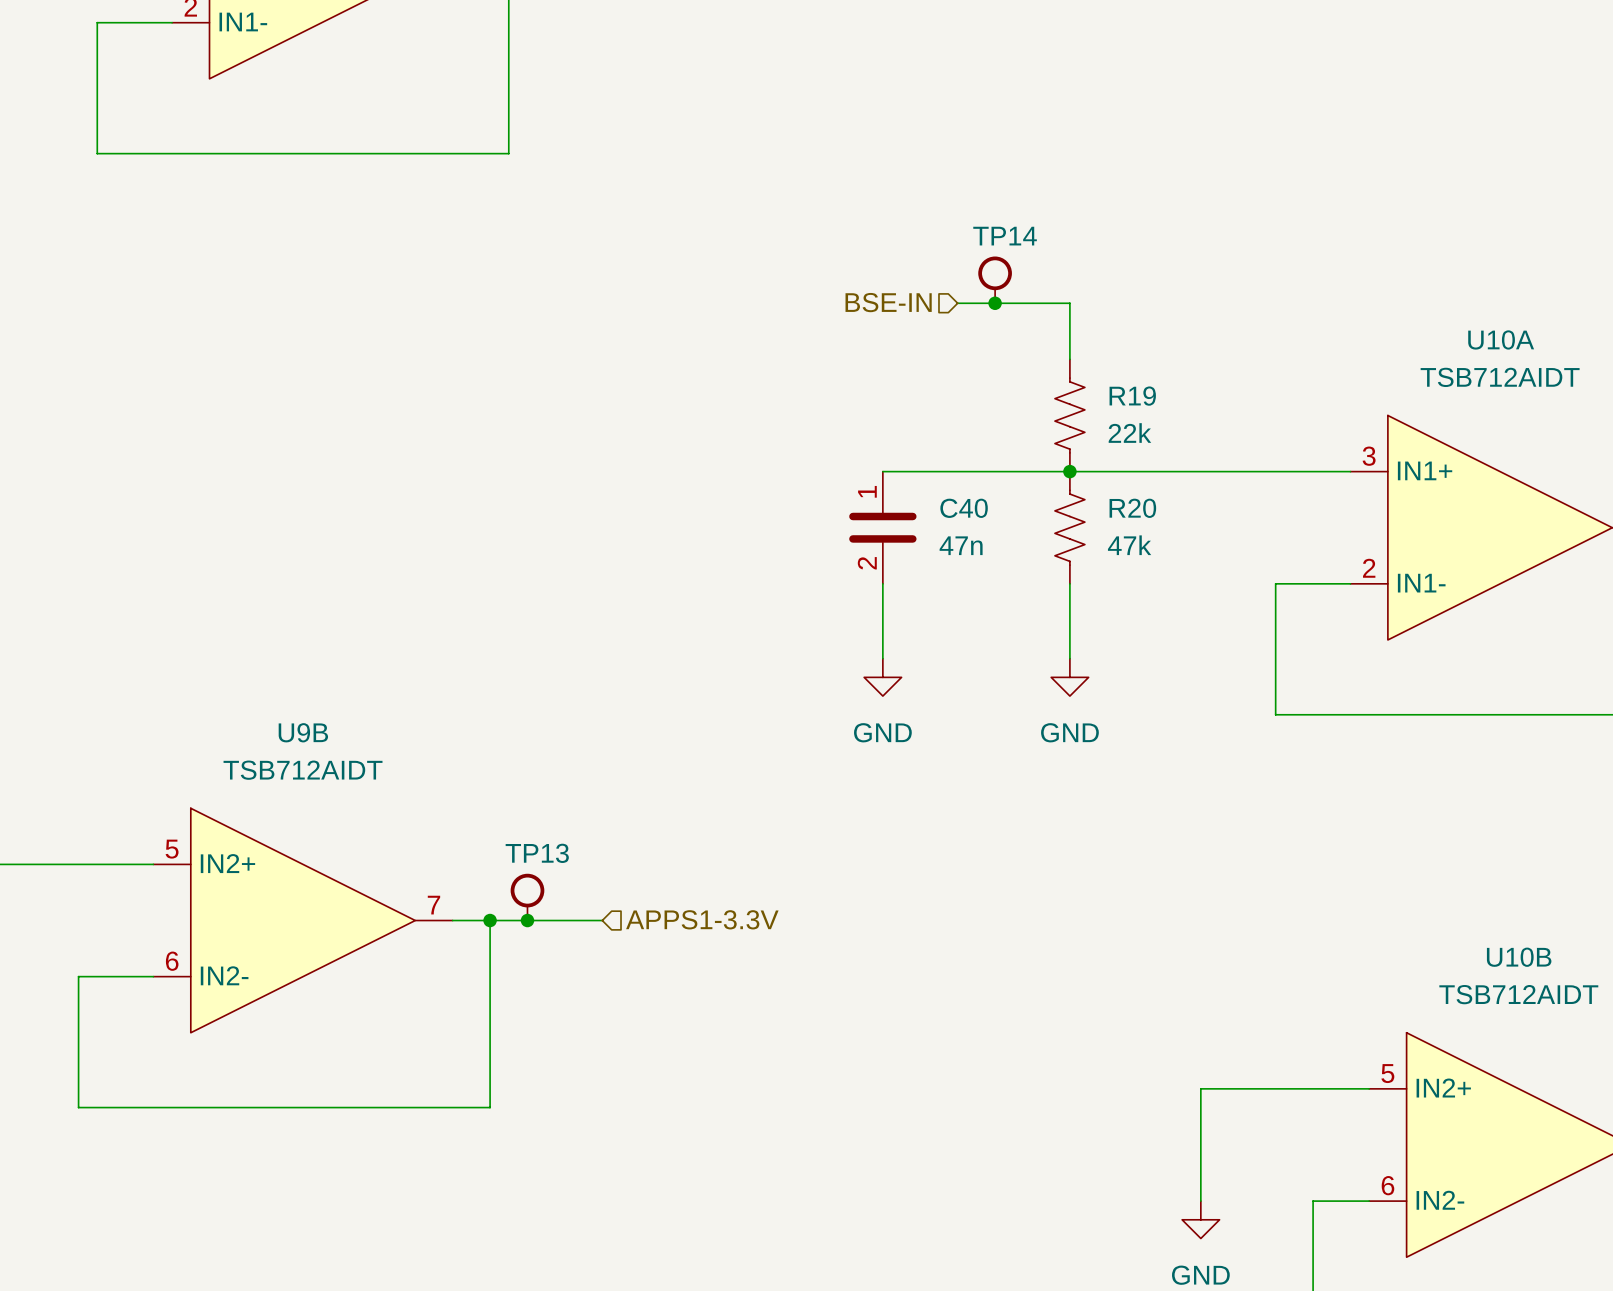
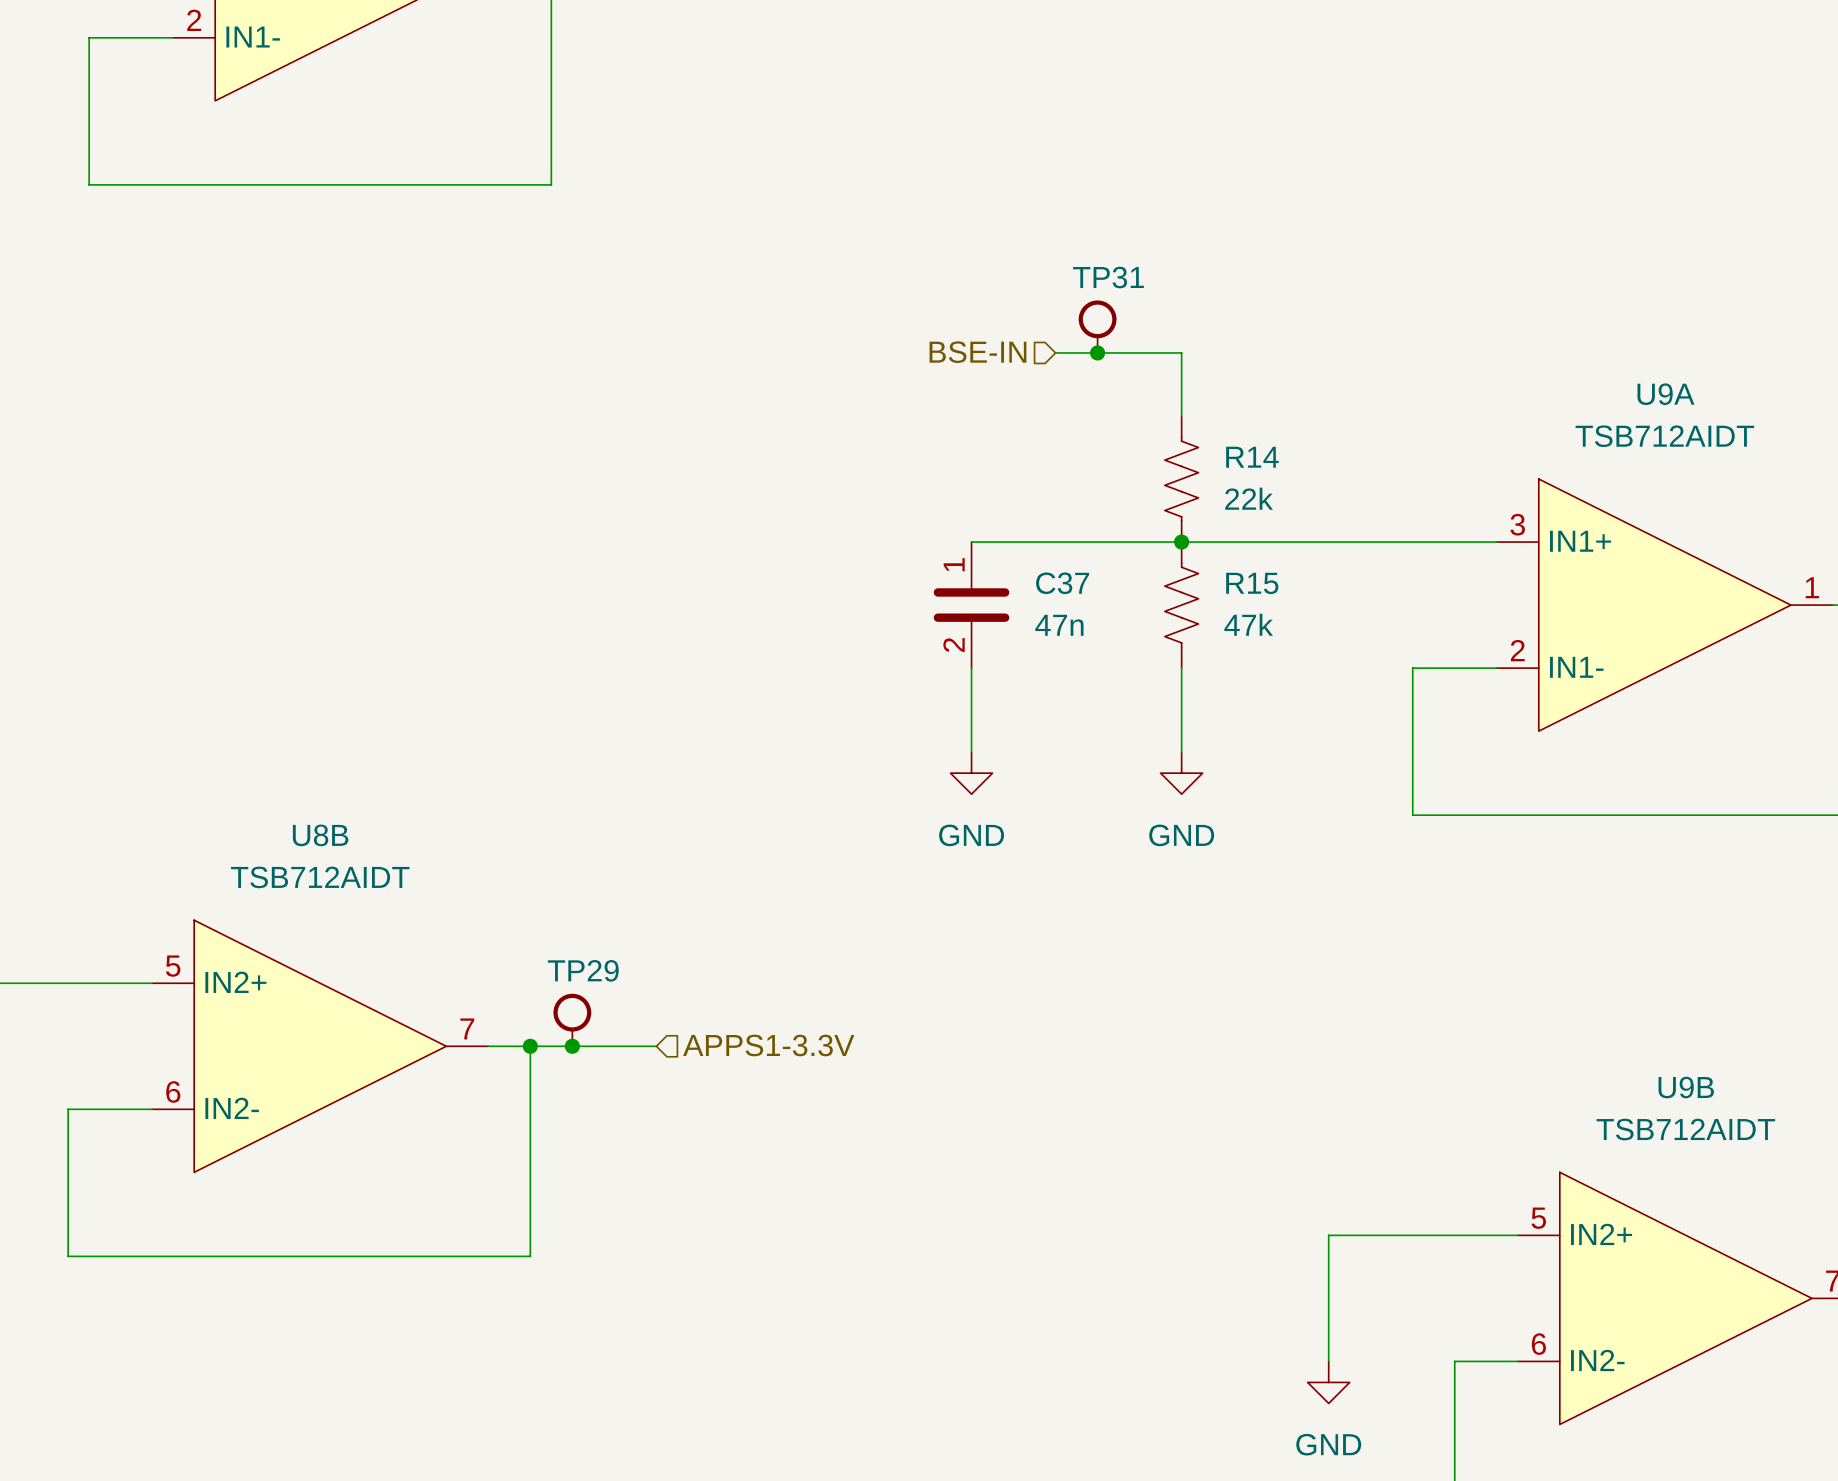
TP14 name: TP14 (1005, 236) -> TP31 (1108, 277)
U10A name: U10A (1501, 339) -> U9A (1666, 394)
R19 name: R19 (1132, 396) -> R14 (1252, 457)
C40 name: C40 (964, 508) -> C37 (1062, 583)
R20 name: R20 (1132, 508) -> R15 (1252, 583)
U9B name: U9B (303, 732) -> U8B (320, 835)
TP13 name: TP13 (537, 853) -> TP29 (583, 970)
U10B name: U10B (1519, 957) -> U9B (1686, 1087)

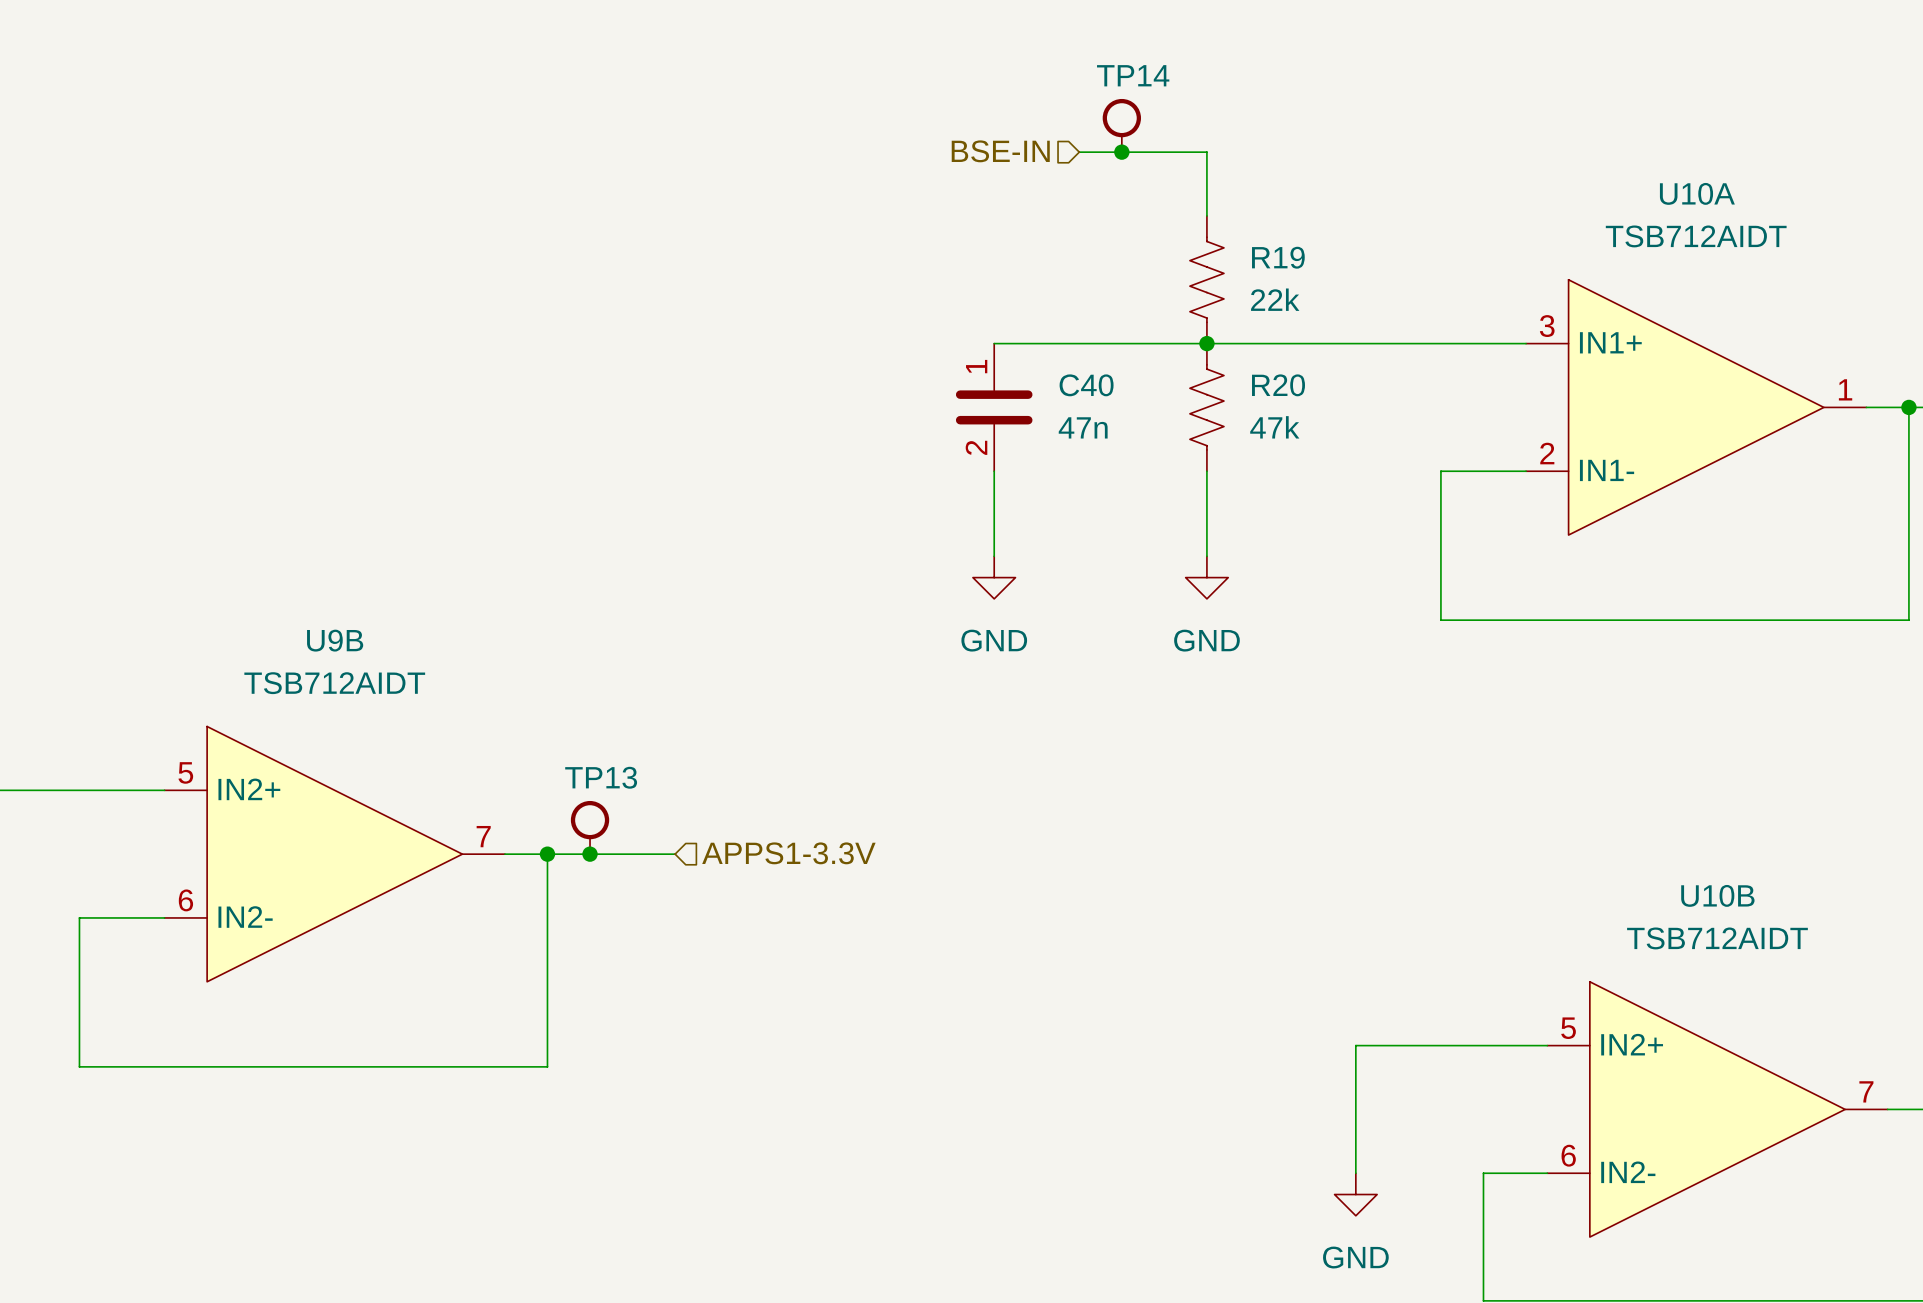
TP31 name: TP31 (1108, 277) -> TP14 (1133, 75)
U9A name: U9A (1666, 394) -> U10A (1697, 193)
R14 name: R14 (1252, 457) -> R19 (1278, 257)
C37 name: C37 (1062, 583) -> C40 (1086, 385)
R15 name: R15 (1252, 583) -> R20 (1278, 385)
U8B name: U8B (320, 835) -> U9B (335, 640)
TP29 name: TP29 (583, 970) -> TP13 (601, 777)
U9B name: U9B (1686, 1087) -> U10B (1717, 895)

